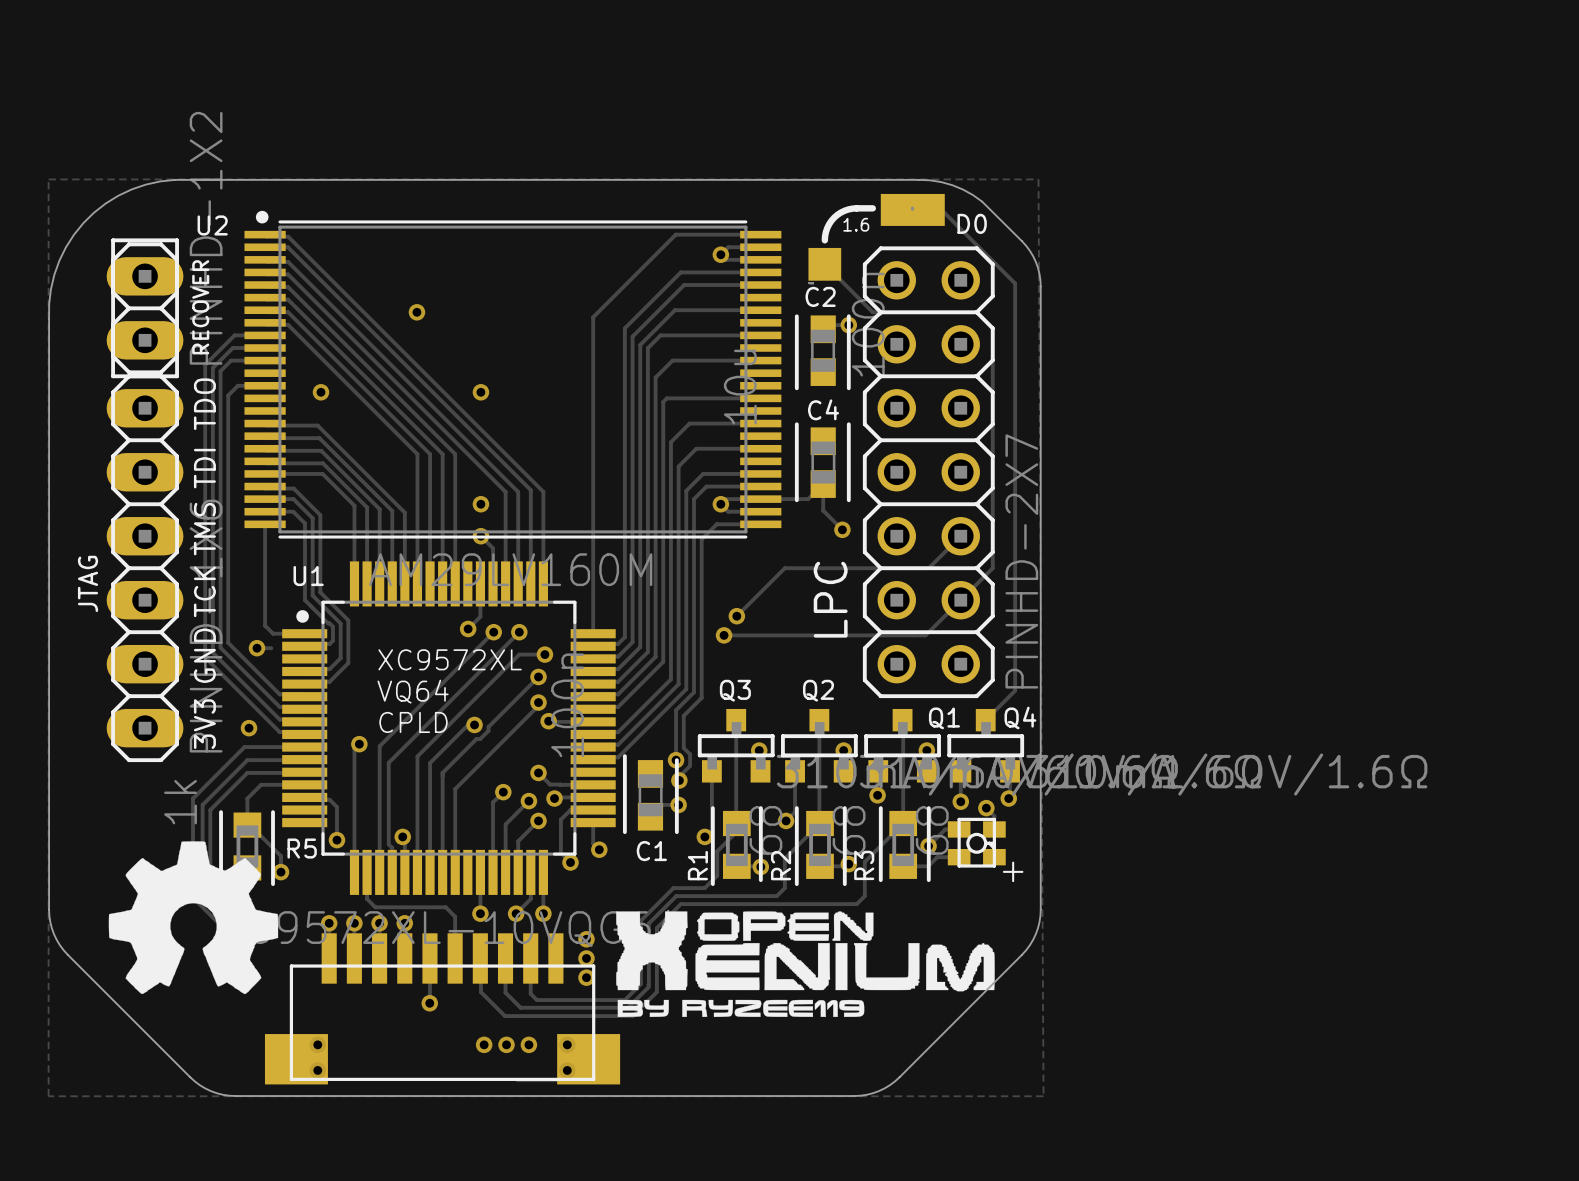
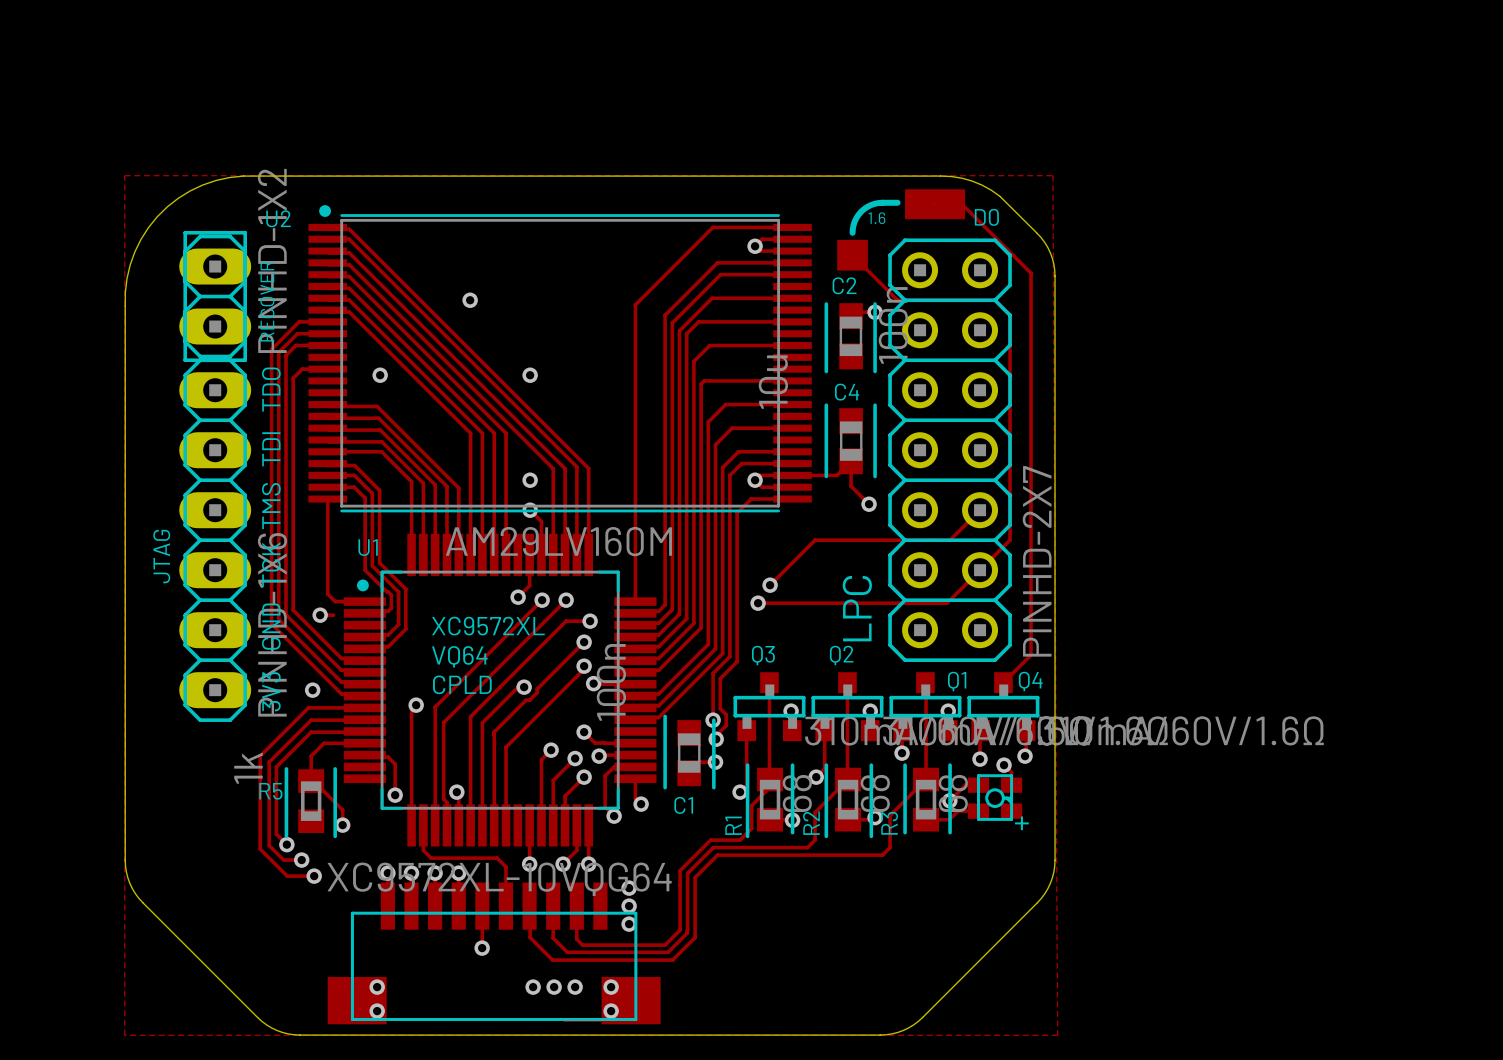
LPC name position: LPC (830, 599) -> LPC (857, 608)
drawing: [108, 841, 995, 1018] -> none
R5 name position: R5 (302, 848) -> R5 (270, 791)

